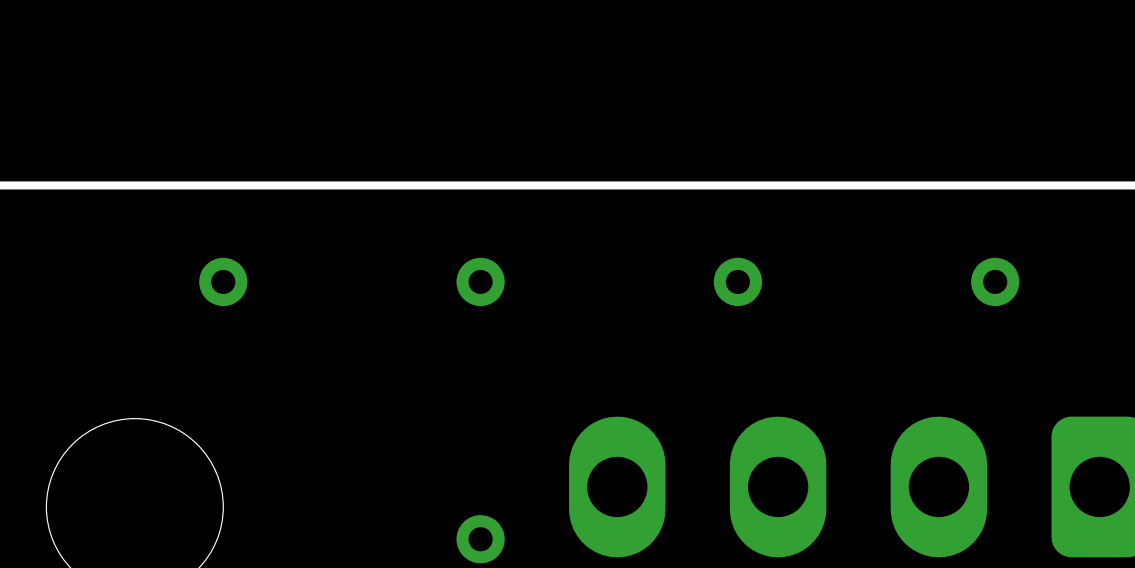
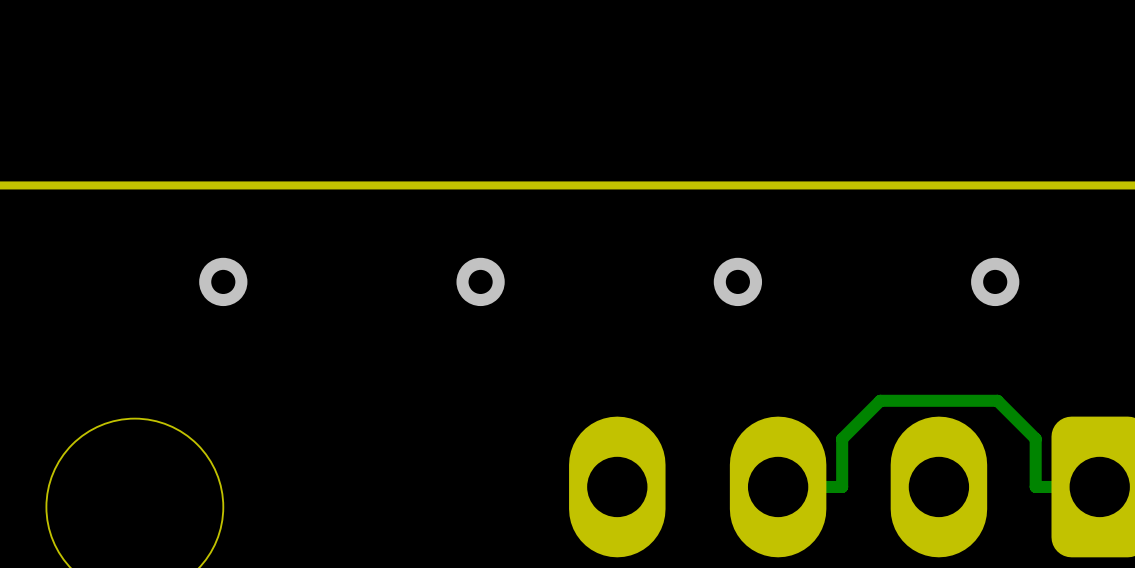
bottom track: none -> (1099, 486) (1035, 486) (1035, 438) (997, 400) (880, 400) (842, 438) (842, 486) (778, 486)
via: (480, 539) -> none

